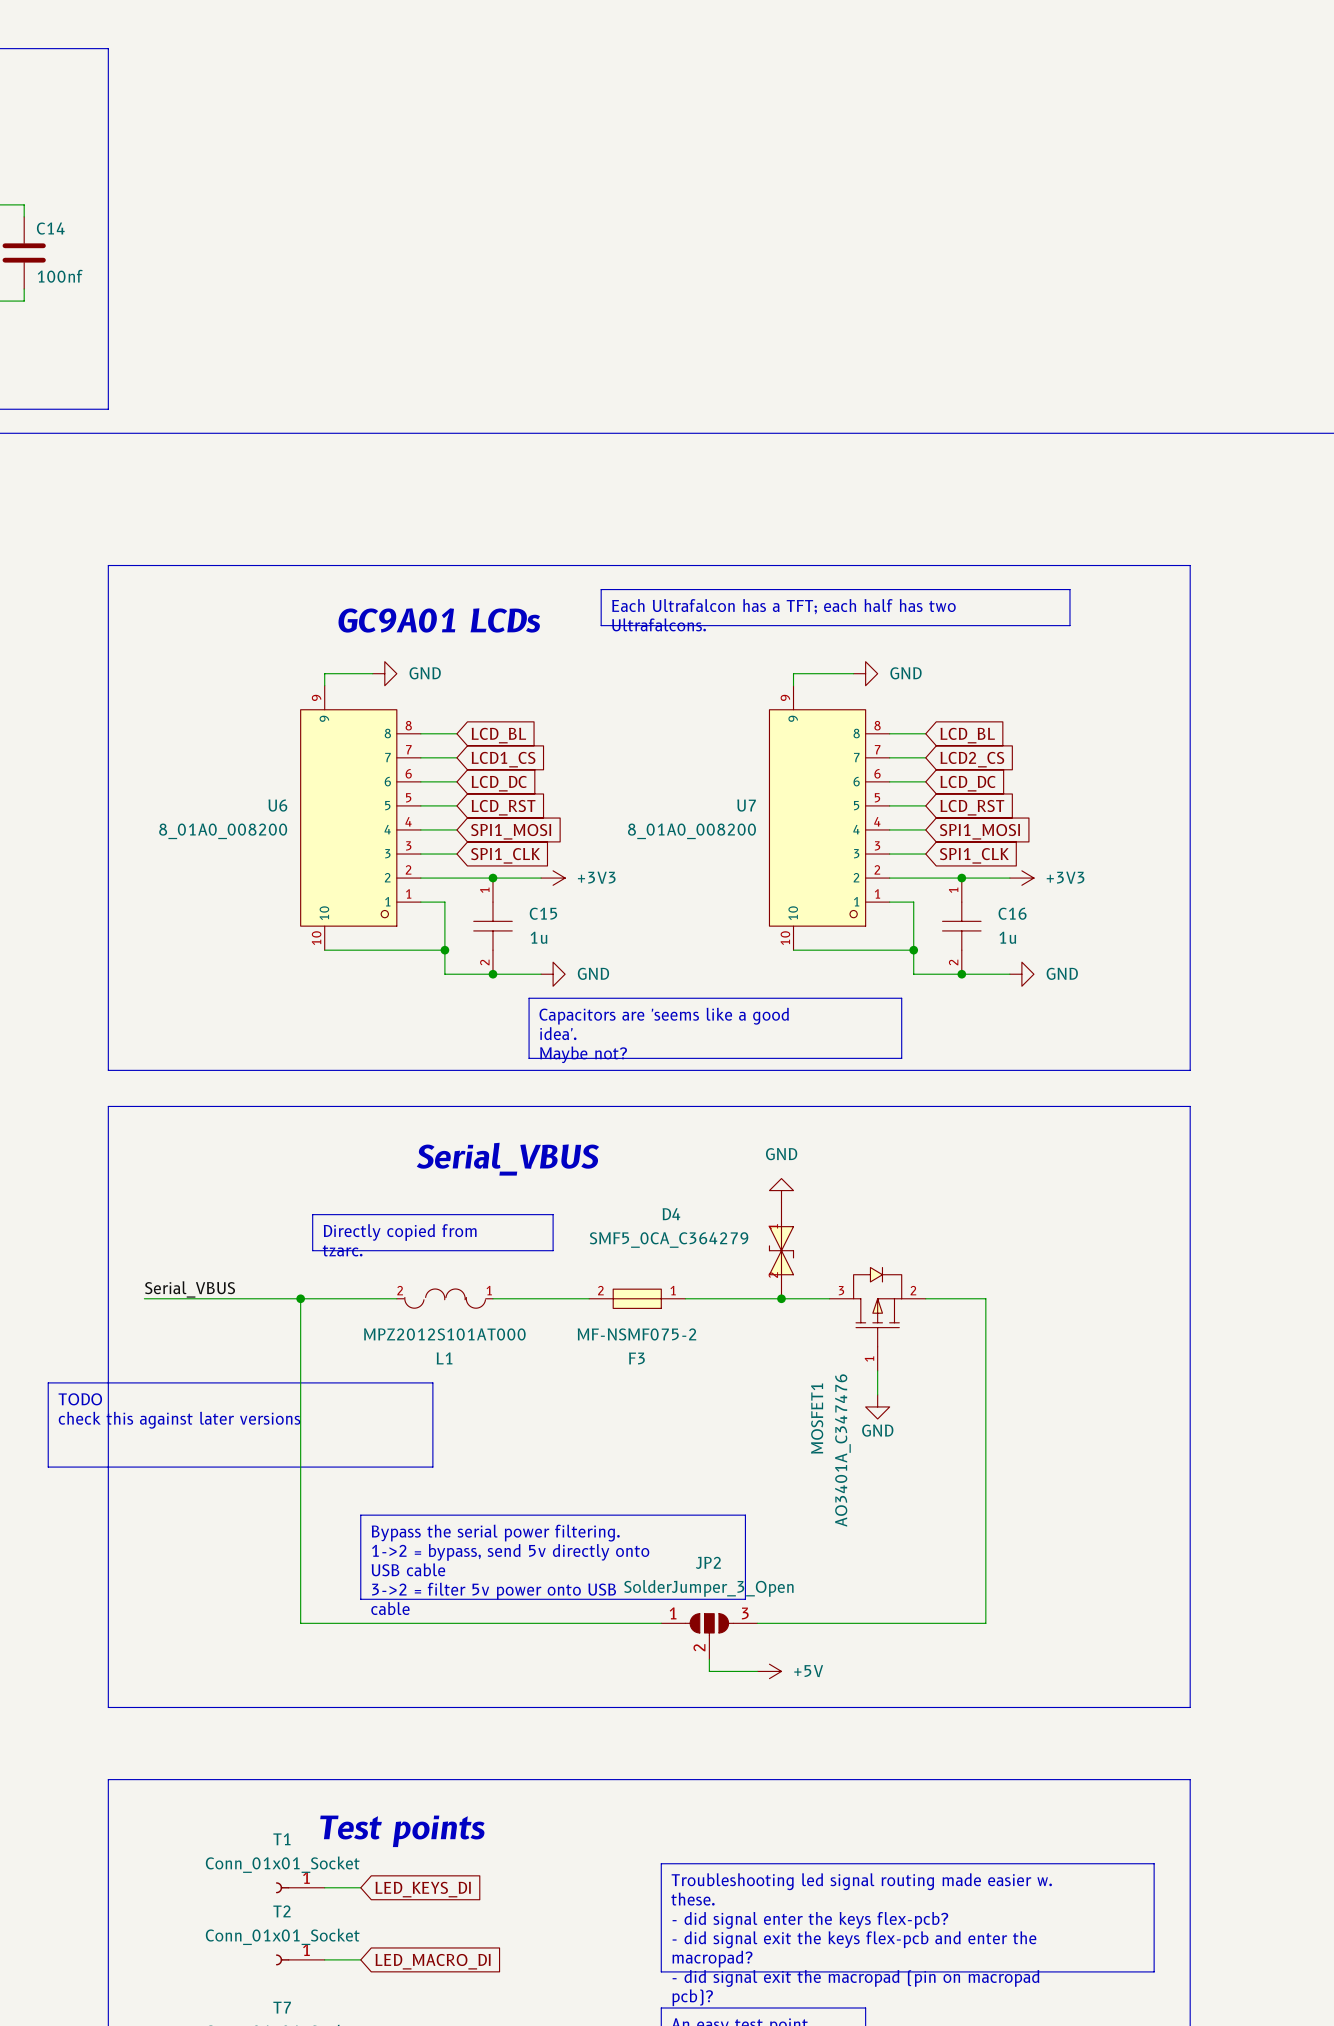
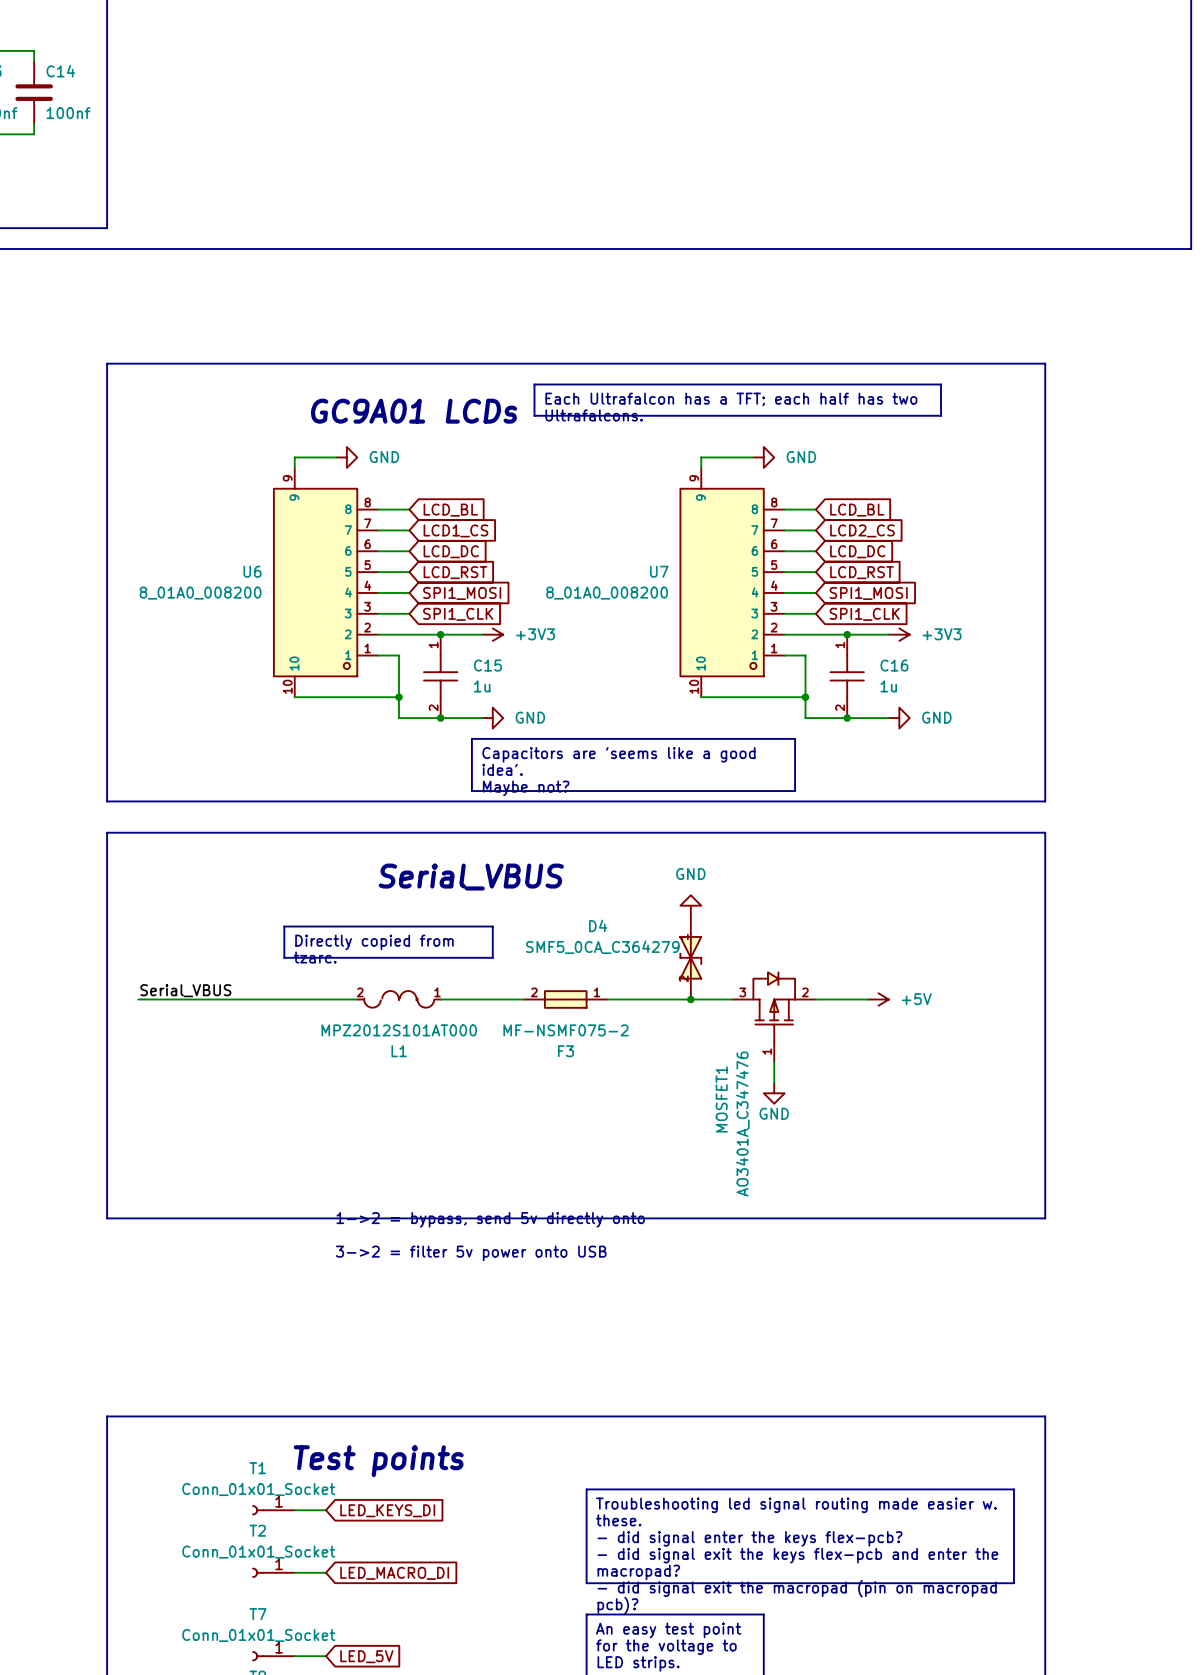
wire: (300, 1298) (300, 1623) (661, 1623) -> none
junction: (300, 1298) -> none
wire: (985, 1298) (985, 1623) (757, 1623) -> none
power symbol: none -> +5V (878, 999)
line: (48, 1382) (432, 1382) (432, 1467) (48, 1467) (48, 1382) -> none
text: TODO (80, 1399) -> none
text: check this against later versions (179, 1420) -> none
line: (360, 1515) (745, 1515) (745, 1599) (360, 1599) (360, 1515) -> none
text: Bypass the serial power filtering. (495, 1533) -> none
line: (108, 1551) (108, 1707) (1190, 1707) (1190, 1551) -> (107, 1218) (1045, 1218)
text: USB cable (408, 1569) -> none
text: cable (390, 1608) -> none
JP2: SolderJumper_3_Open (709, 1636) -> none
wire: (709, 1659) (709, 1671) (757, 1671) -> none
power symbol: +5V (769, 1671) -> none

